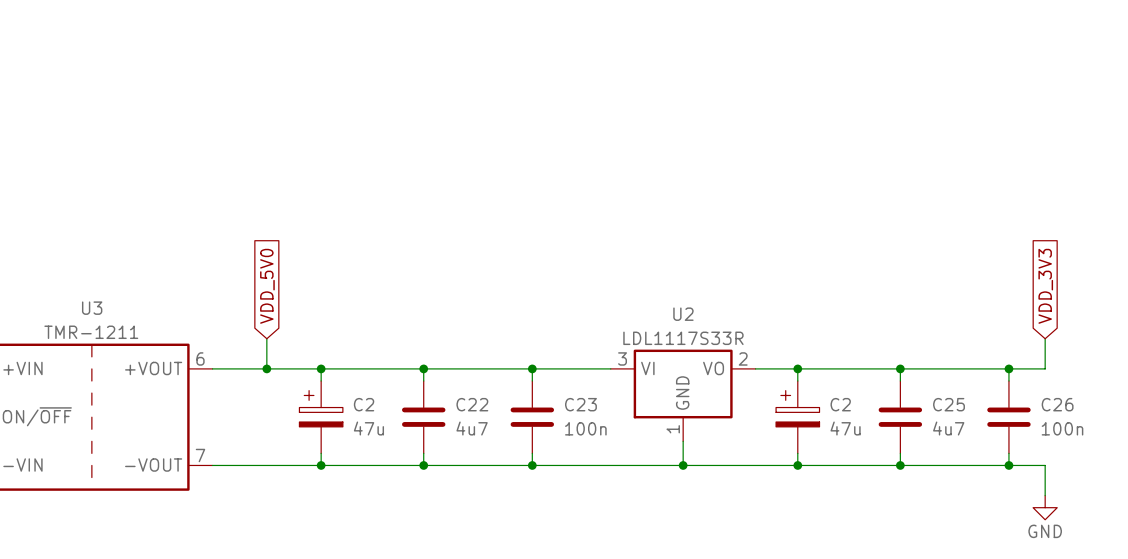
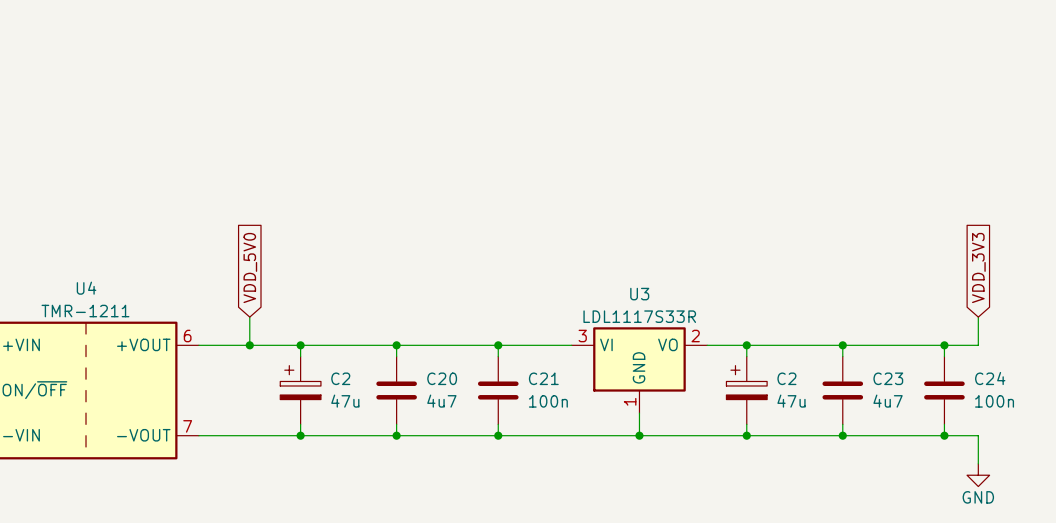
U3 name: U3 (92, 308) -> U4 (86, 288)
U2 name: U2 (683, 314) -> U3 (639, 294)
C22 name: C22 (472, 404) -> C20 (442, 378)
C23 name: C23 (580, 404) -> C21 (543, 378)
C25 name: C25 (949, 404) -> C23 (888, 378)
C26 name: C26 (1057, 404) -> C24 (990, 378)

